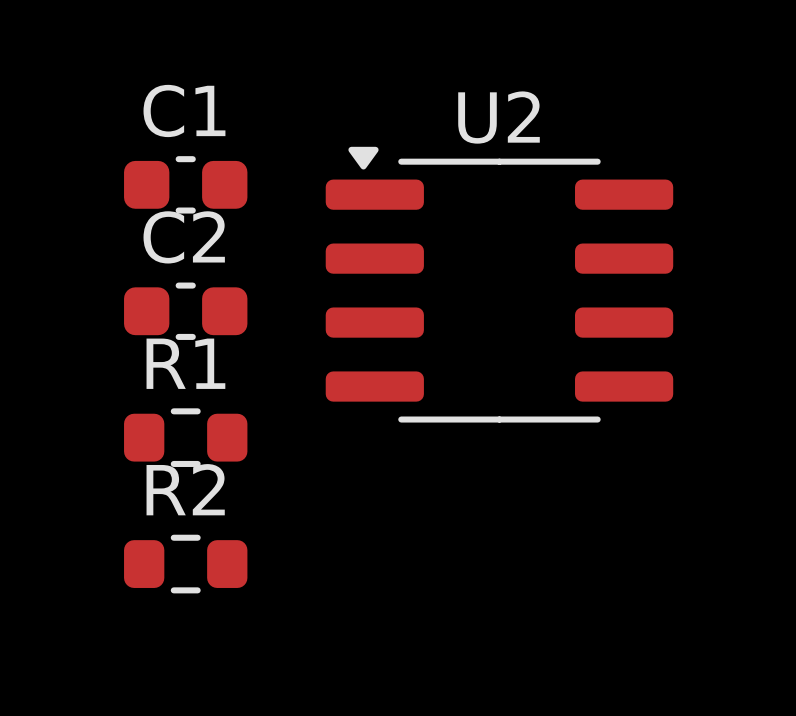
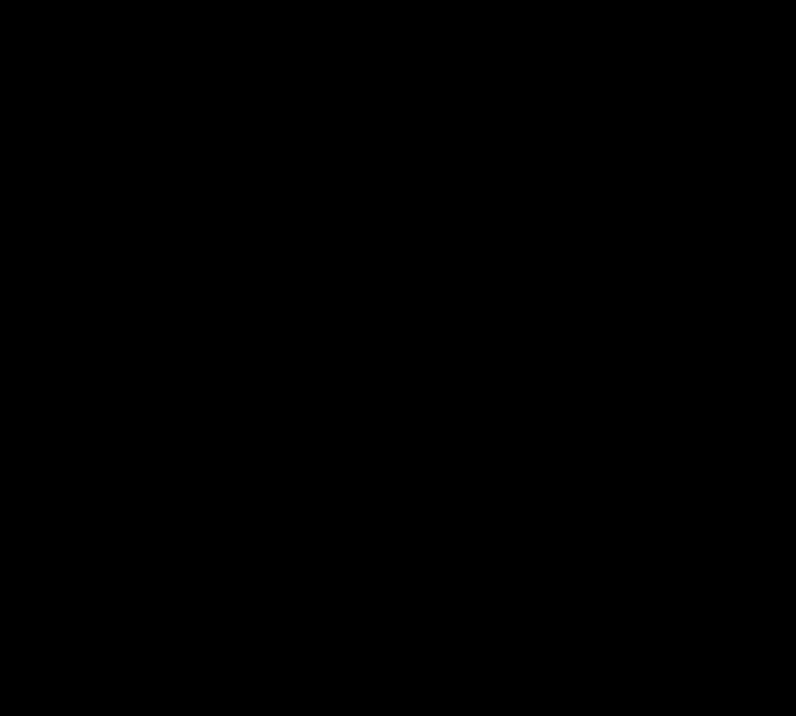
C1: (185, 184) -> none
U2: (499, 284) -> none
C2: (185, 311) -> none
R1: (185, 437) -> none
R2: (185, 564) -> none

